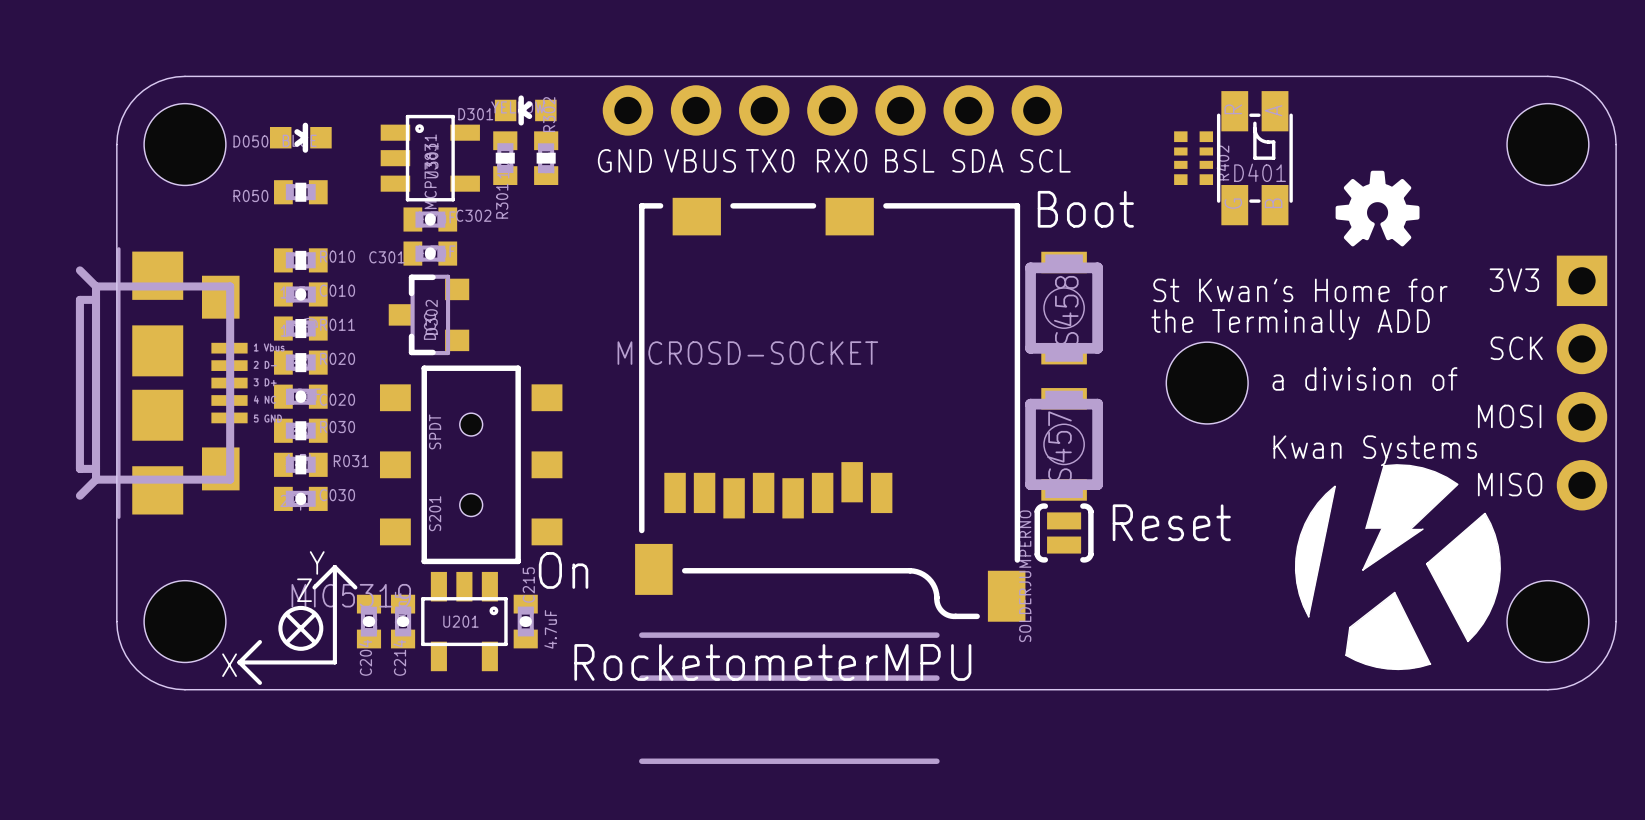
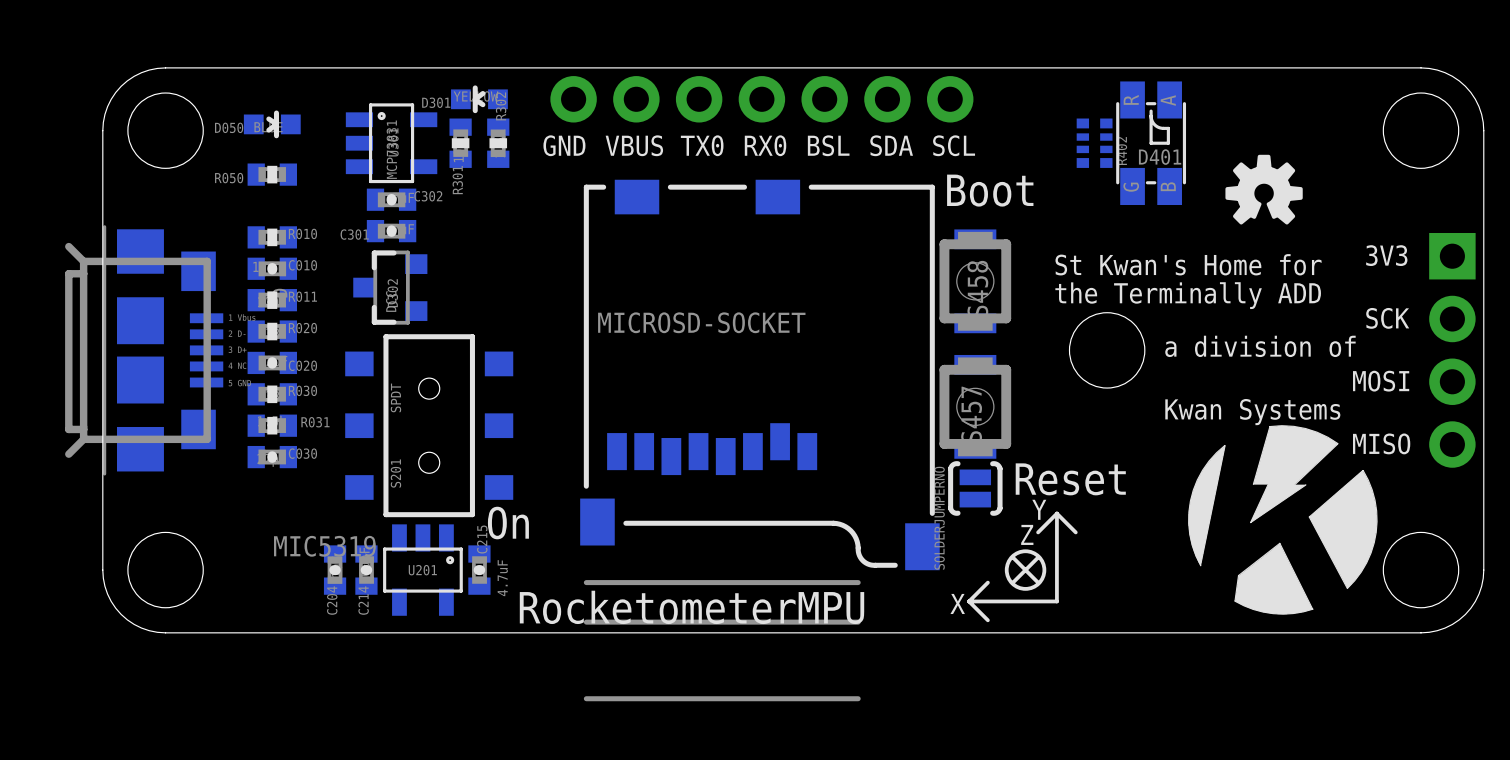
drawing: none -> [967, 511, 1078, 623]
drawing: [237, 565, 358, 685] -> none

